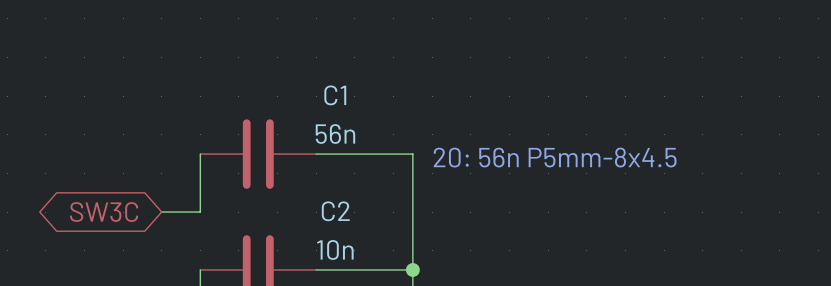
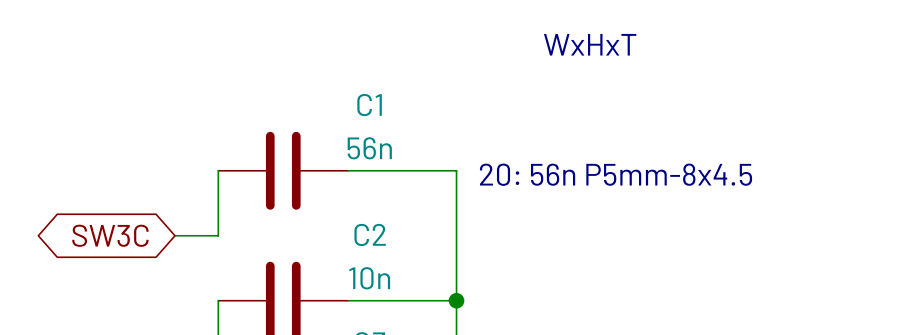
text: none -> WxHxT (590, 44)

